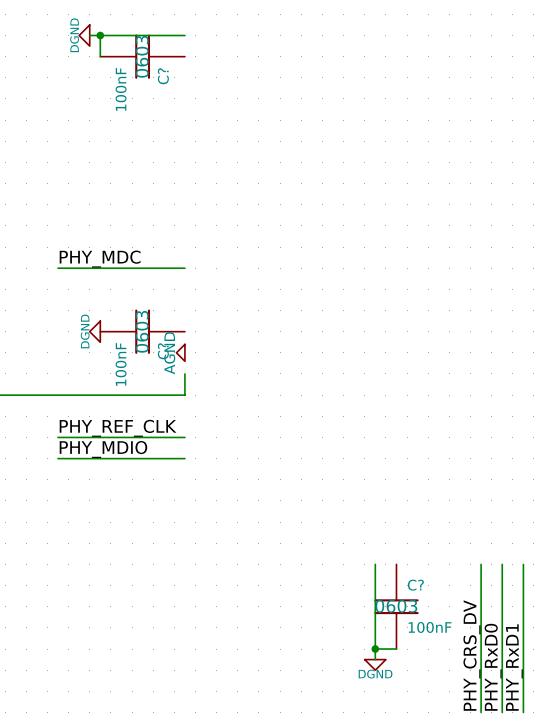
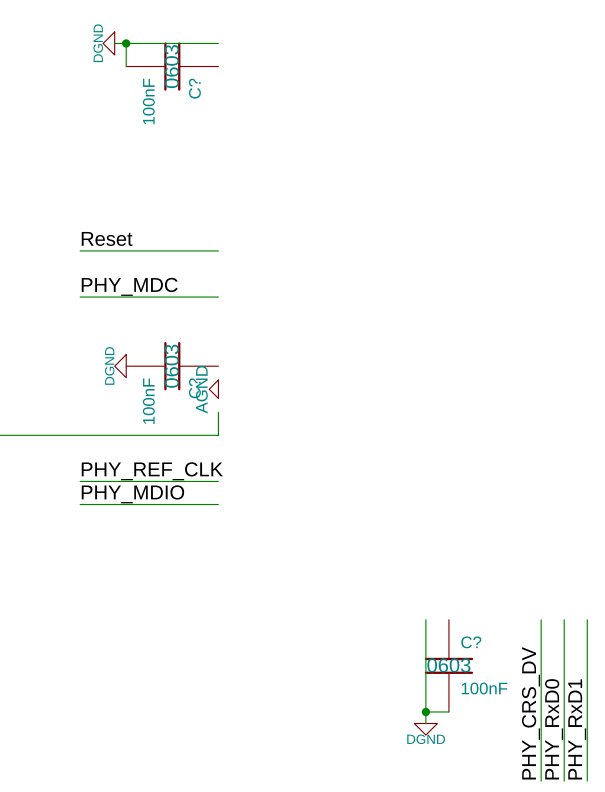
label: none -> Reset (107, 238)
wire: none -> (80, 250) (218, 250)

